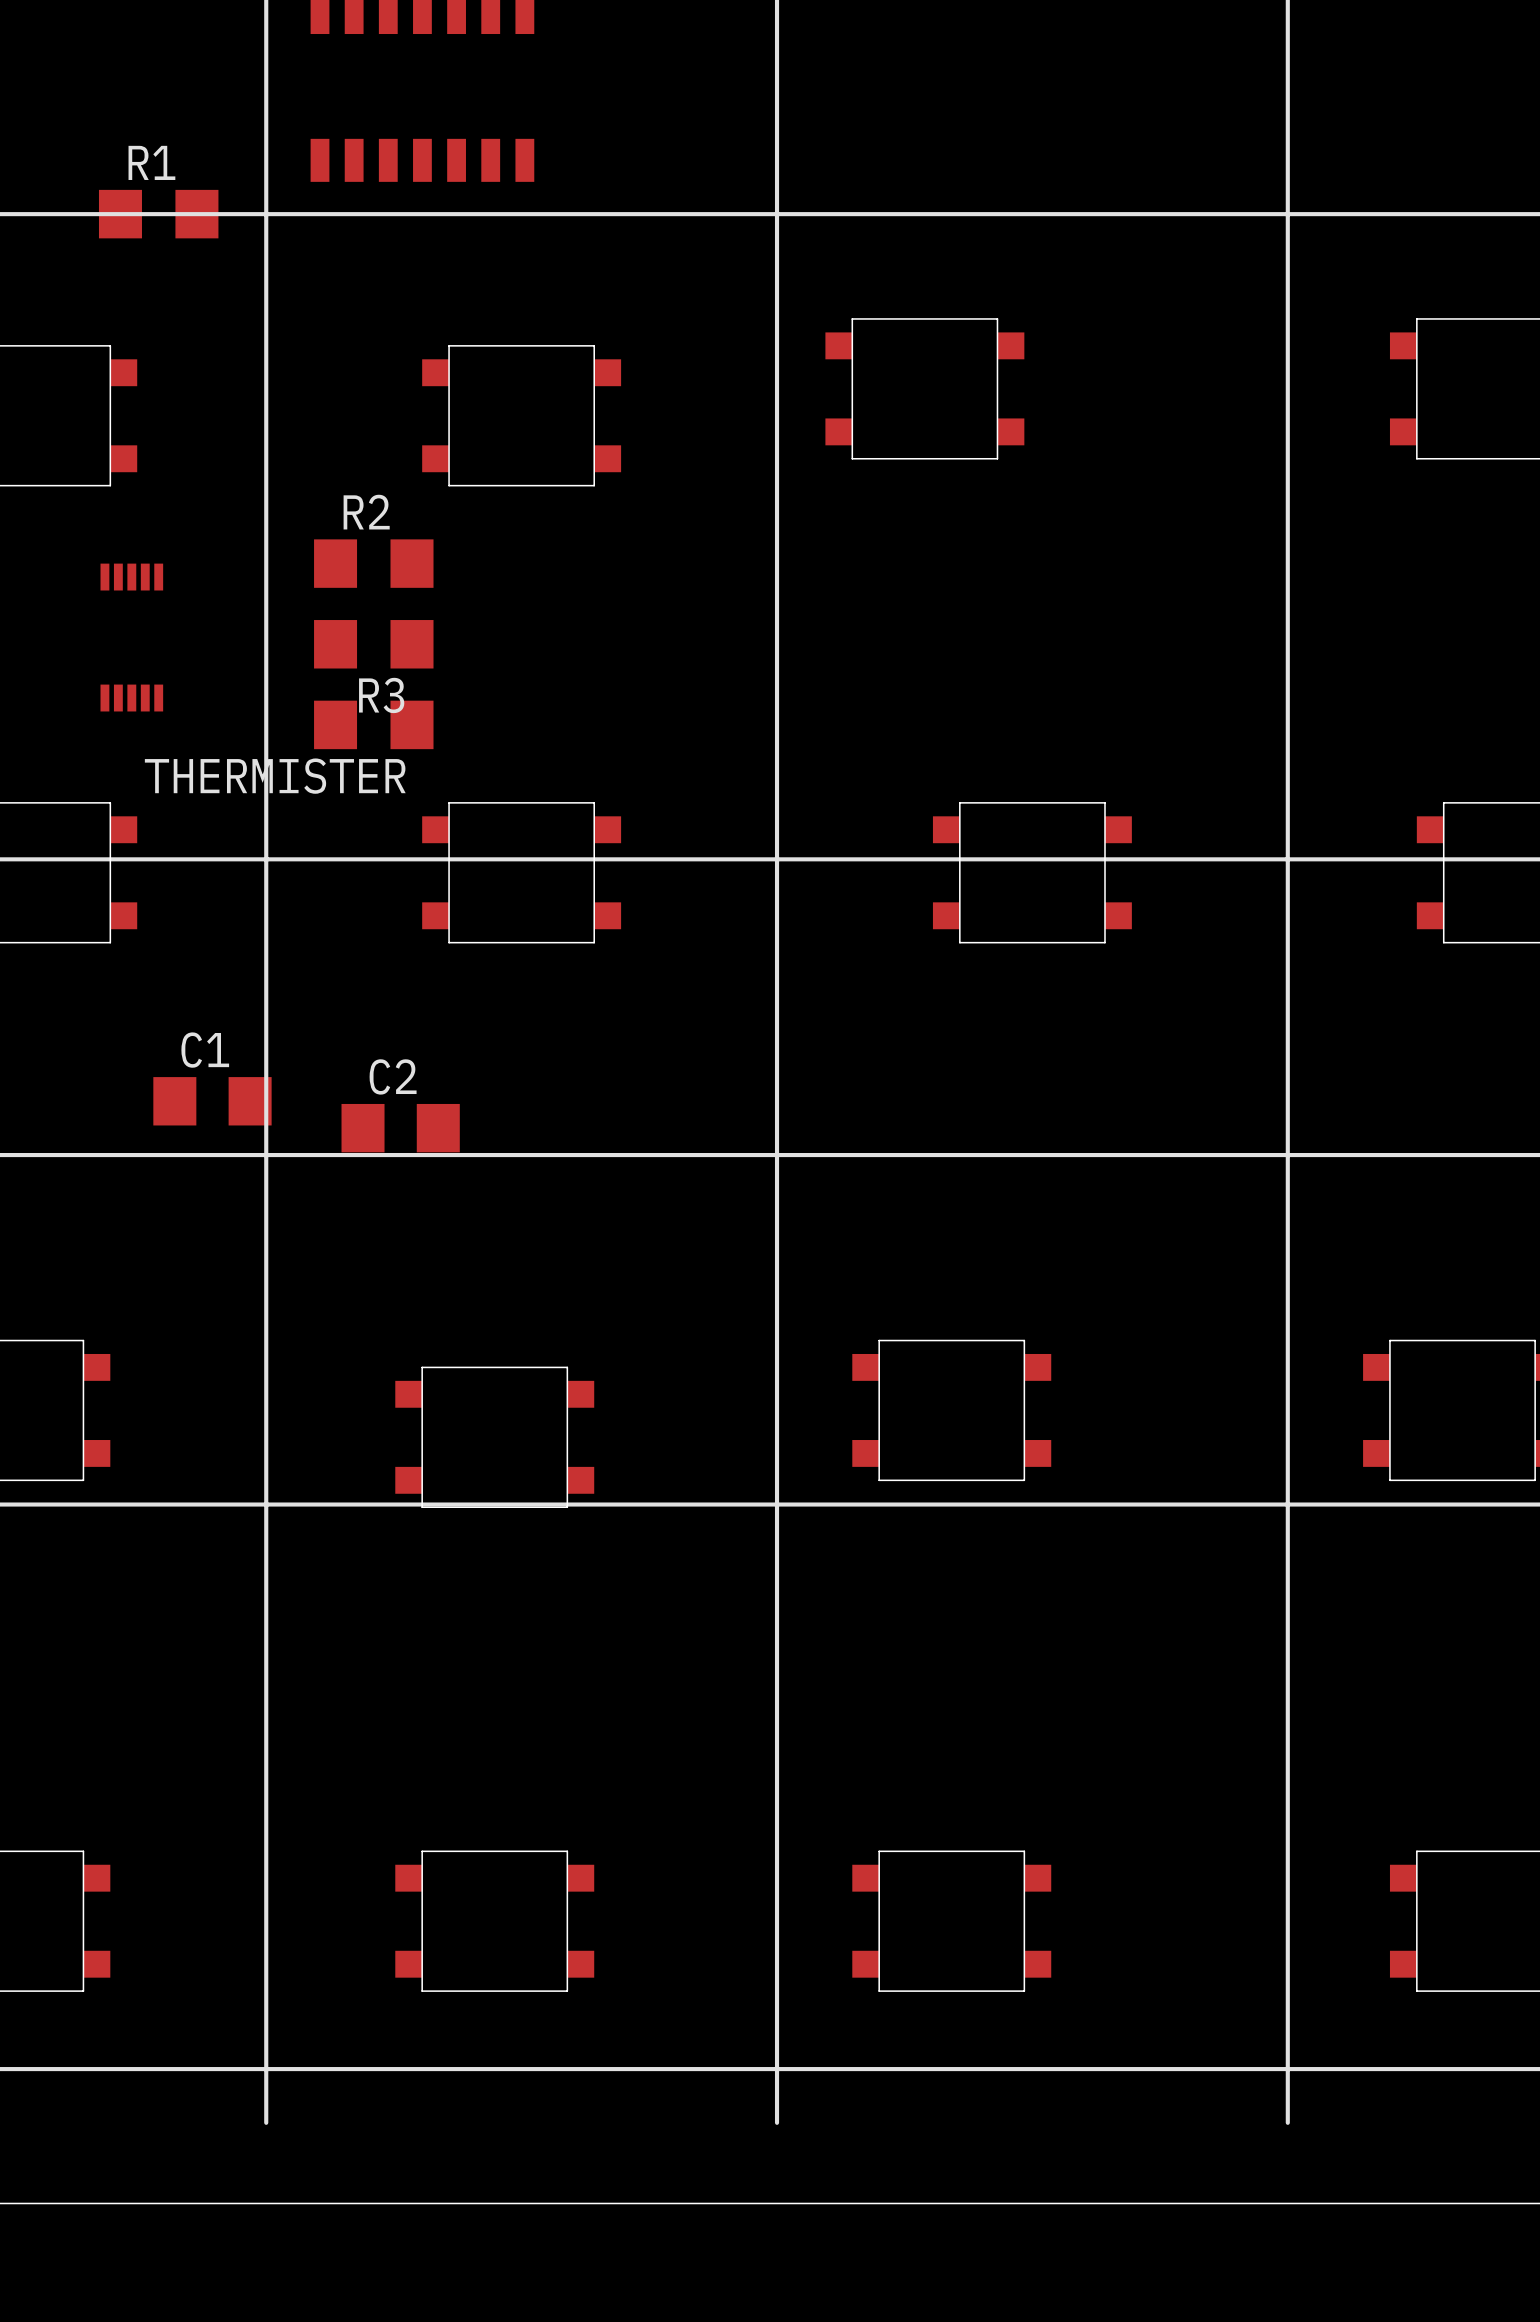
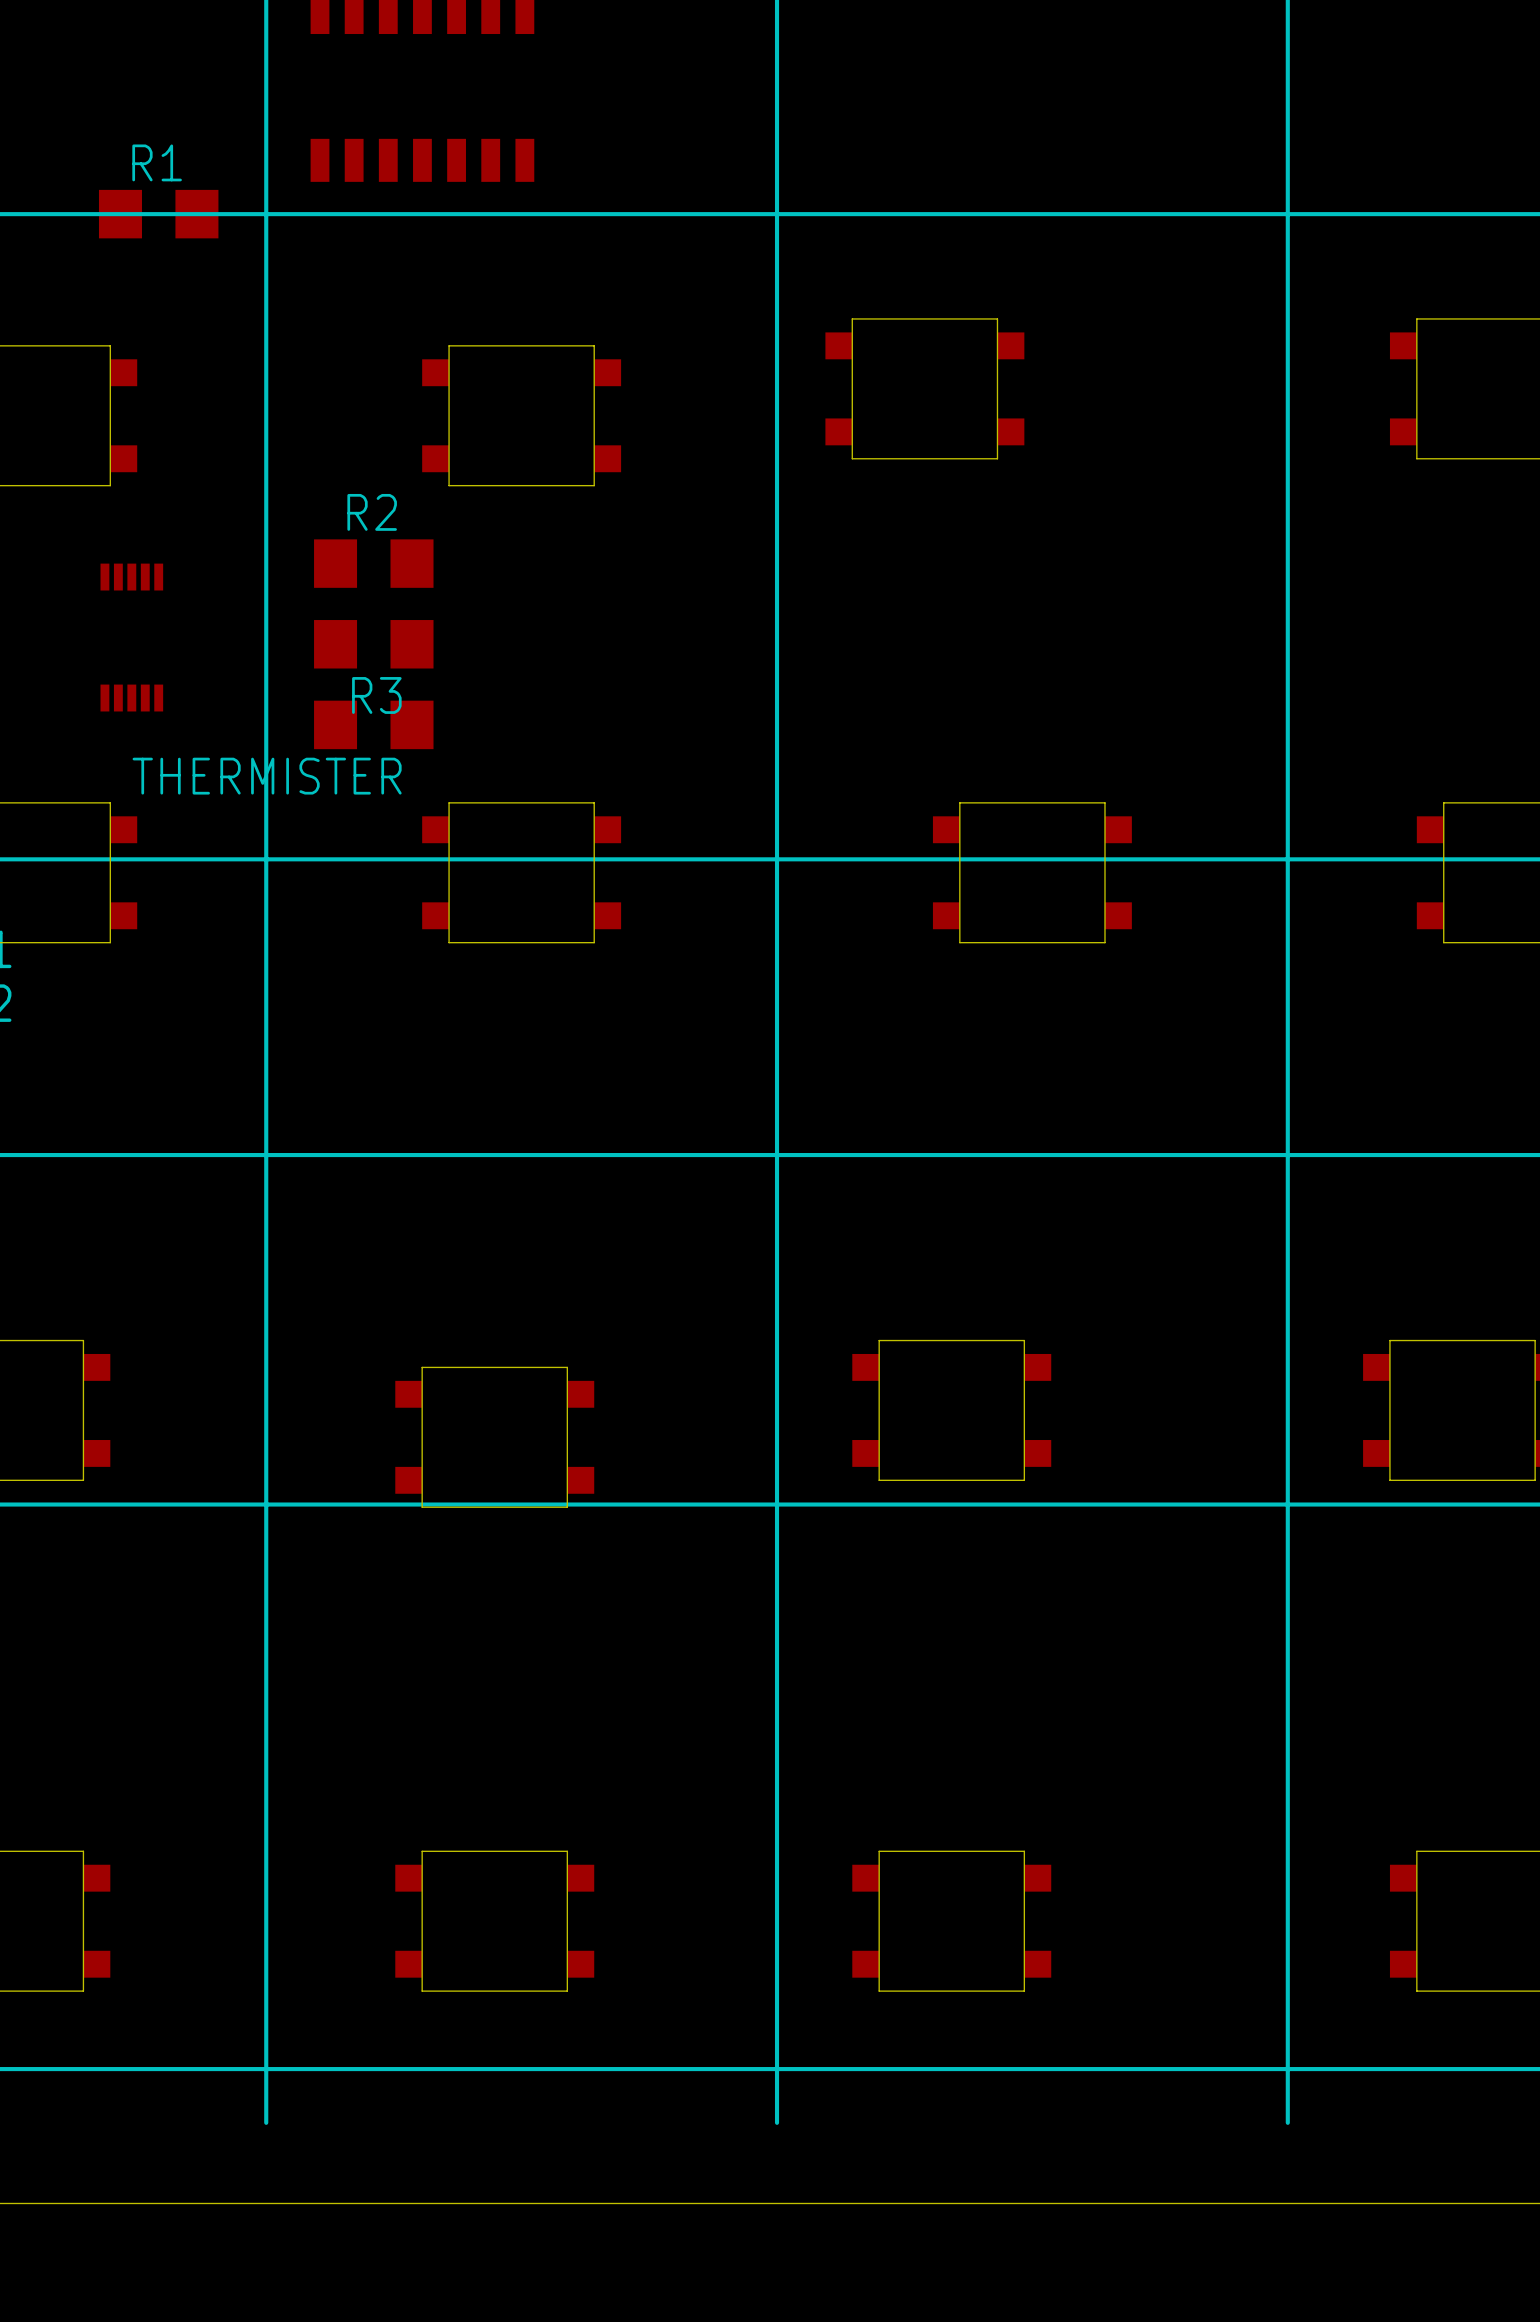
C1: (212, 1101) -> none
C2: (400, 1128) -> none

